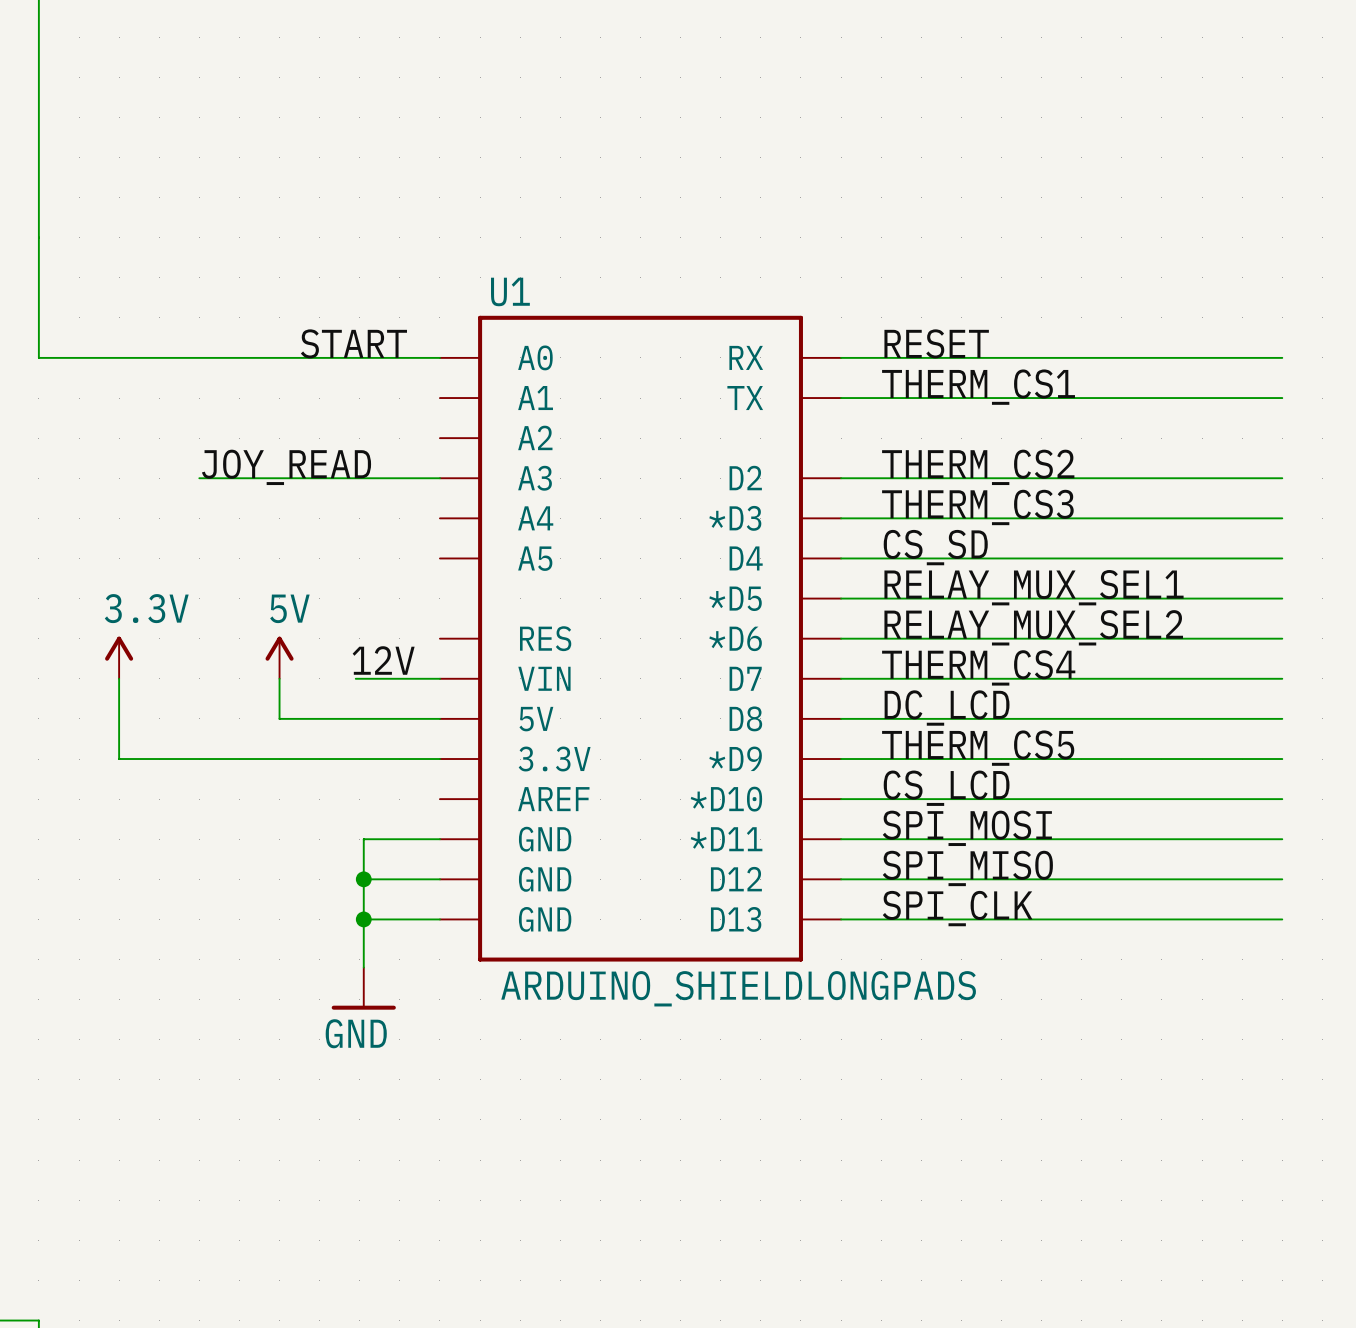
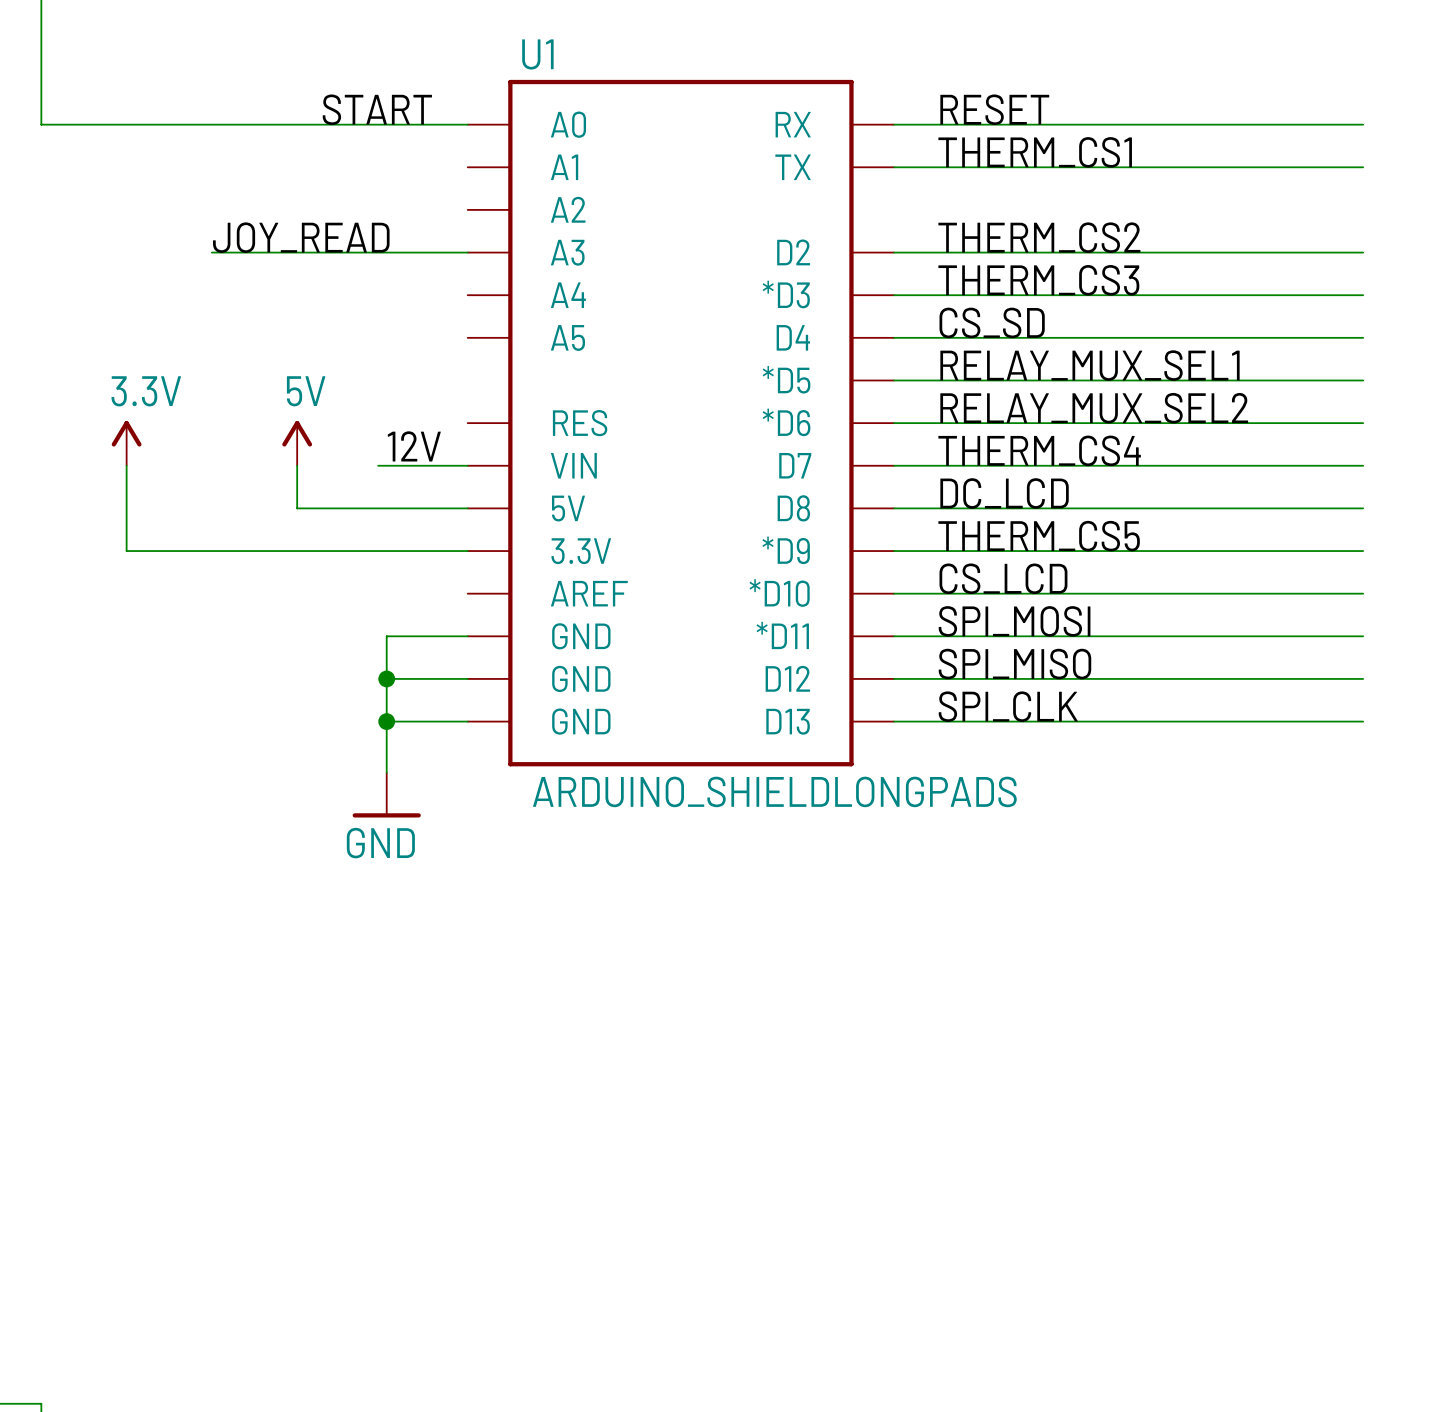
label: none -> RESET (994, 109)
wire: (38, 117) (38, 357) (439, 357) -> (41, 124) (467, 124)
wire: none -> (894, 124) (1363, 124)
label: none -> THERM_CS1 (1035, 152)
wire: none -> (894, 167) (1363, 167)
label: none -> THERM_CS2 (1039, 237)
wire: none -> (211, 252) (467, 252)
wire: none -> (894, 252) (1363, 252)
label: none -> THERM_CS3 (1038, 280)
wire: none -> (894, 295) (1363, 295)
label: none -> CS_SD (992, 322)
wire: none -> (894, 337) (1363, 337)
label position: START (353, 343) -> START (377, 109)
label: RESET (936, 343) -> RELAY_MUX_SEL1 (1089, 365)
label: THERM_CS1 (978, 387) -> RELAY_MUX_SEL2 (1094, 408)
label: none -> THERM_CS4 (1039, 450)
wire: none -> (378, 465) (467, 465)
label position: JOY_READ (286, 467) -> JOY_READ (301, 237)
label: THERM_CS2 (978, 467) -> DC_LCD (1004, 493)
wire: (199, 478) (279, 478) -> (297, 465) (297, 508)
label: THERM_CS3 (977, 507) -> THERM_CS5 (1039, 536)
label: CS_SD (935, 547) -> CS_LCD (1003, 578)
label: RELAY_MUX_SEL1 (1034, 587) -> SPI_MOSI (1014, 621)
label: RELAY_MUX_SEL2 (1033, 627) -> SPI_MISO (1014, 664)
junction: none -> (386, 678)
U1 position: (640, 638) -> (680, 423)
power symbol position: 3.3V (119, 657) -> 3.3V (126, 443)
power symbol position: 5V (279, 657) -> 5V (297, 443)
label position: 12V (383, 660) -> 12V (414, 446)
label: THERM_CS4 (978, 667) -> SPI_CLK (1008, 706)
wire: (119, 678) (119, 759) (439, 759) -> (126, 465) (126, 551) (467, 551)
wire: (279, 678) (279, 718) (439, 718) -> none
junction: none -> (386, 721)
label: DC_LCD (947, 708) -> none
wire: (841, 718) (1282, 718) -> (894, 465) (1363, 465)
label: THERM_CS5 (978, 748) -> none
wire: (841, 759) (1282, 759) -> none
label: CS_LCD (946, 788) -> none
wire: (841, 799) (1282, 799) -> none
label: SPI_MOSI (967, 828) -> none
wire: (439, 839) (363, 839) (363, 967) -> (467, 636) (386, 636) (386, 772)
wire: (841, 839) (1282, 839) -> none
label: SPI_MISO (967, 868) -> none
wire: (363, 879) (439, 879) -> (386, 678) (467, 678)
junction: (363, 879) -> none
wire: (841, 879) (1282, 879) -> none
label: SPI_CLK (957, 908) -> none
wire: (363, 919) (439, 919) -> none
junction: (363, 919) -> none
wire: (841, 919) (1282, 919) -> none
power symbol position: GND (363, 988) -> GND (386, 795)

